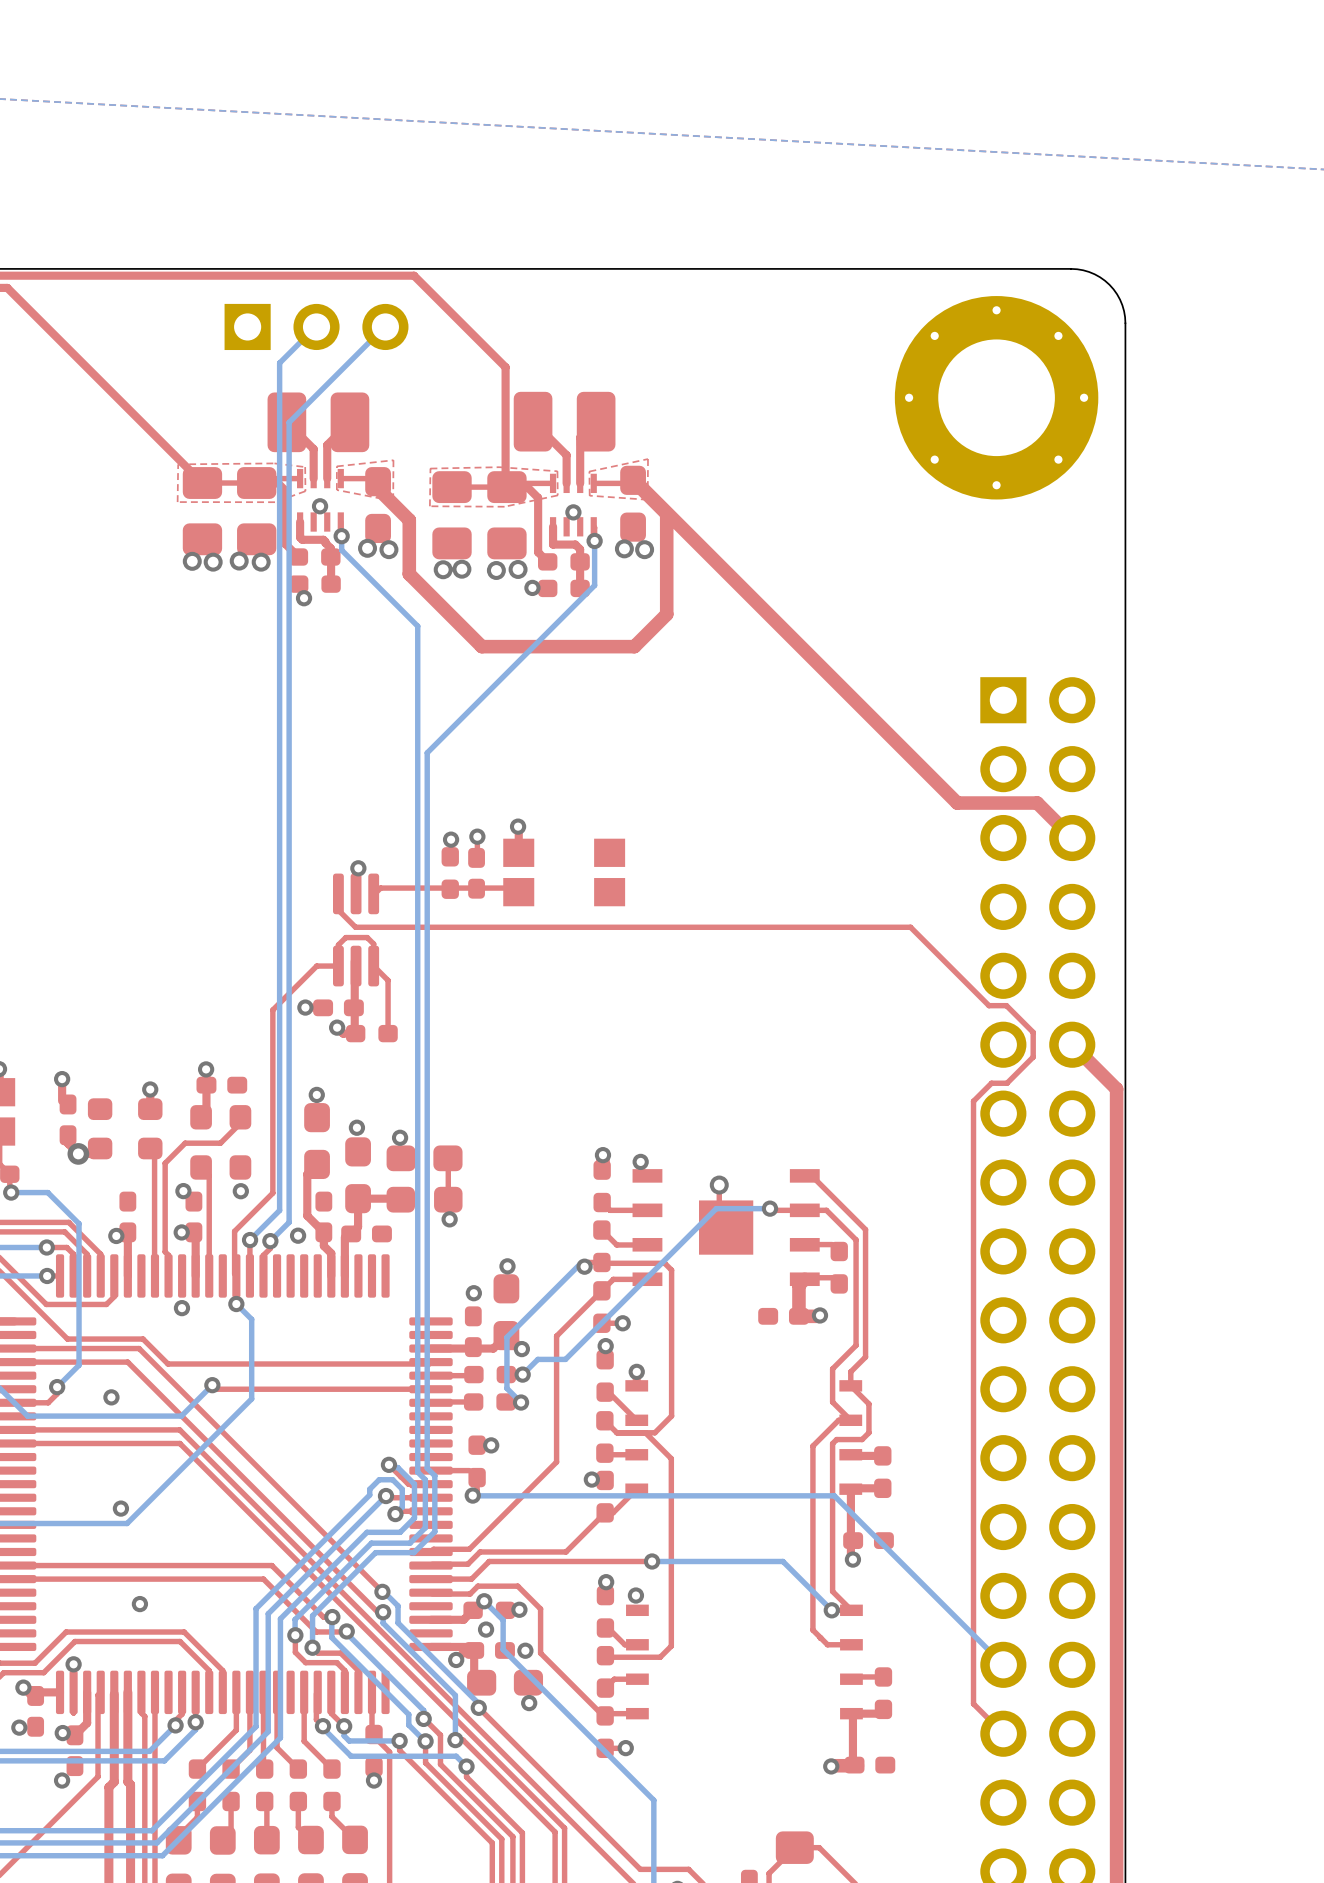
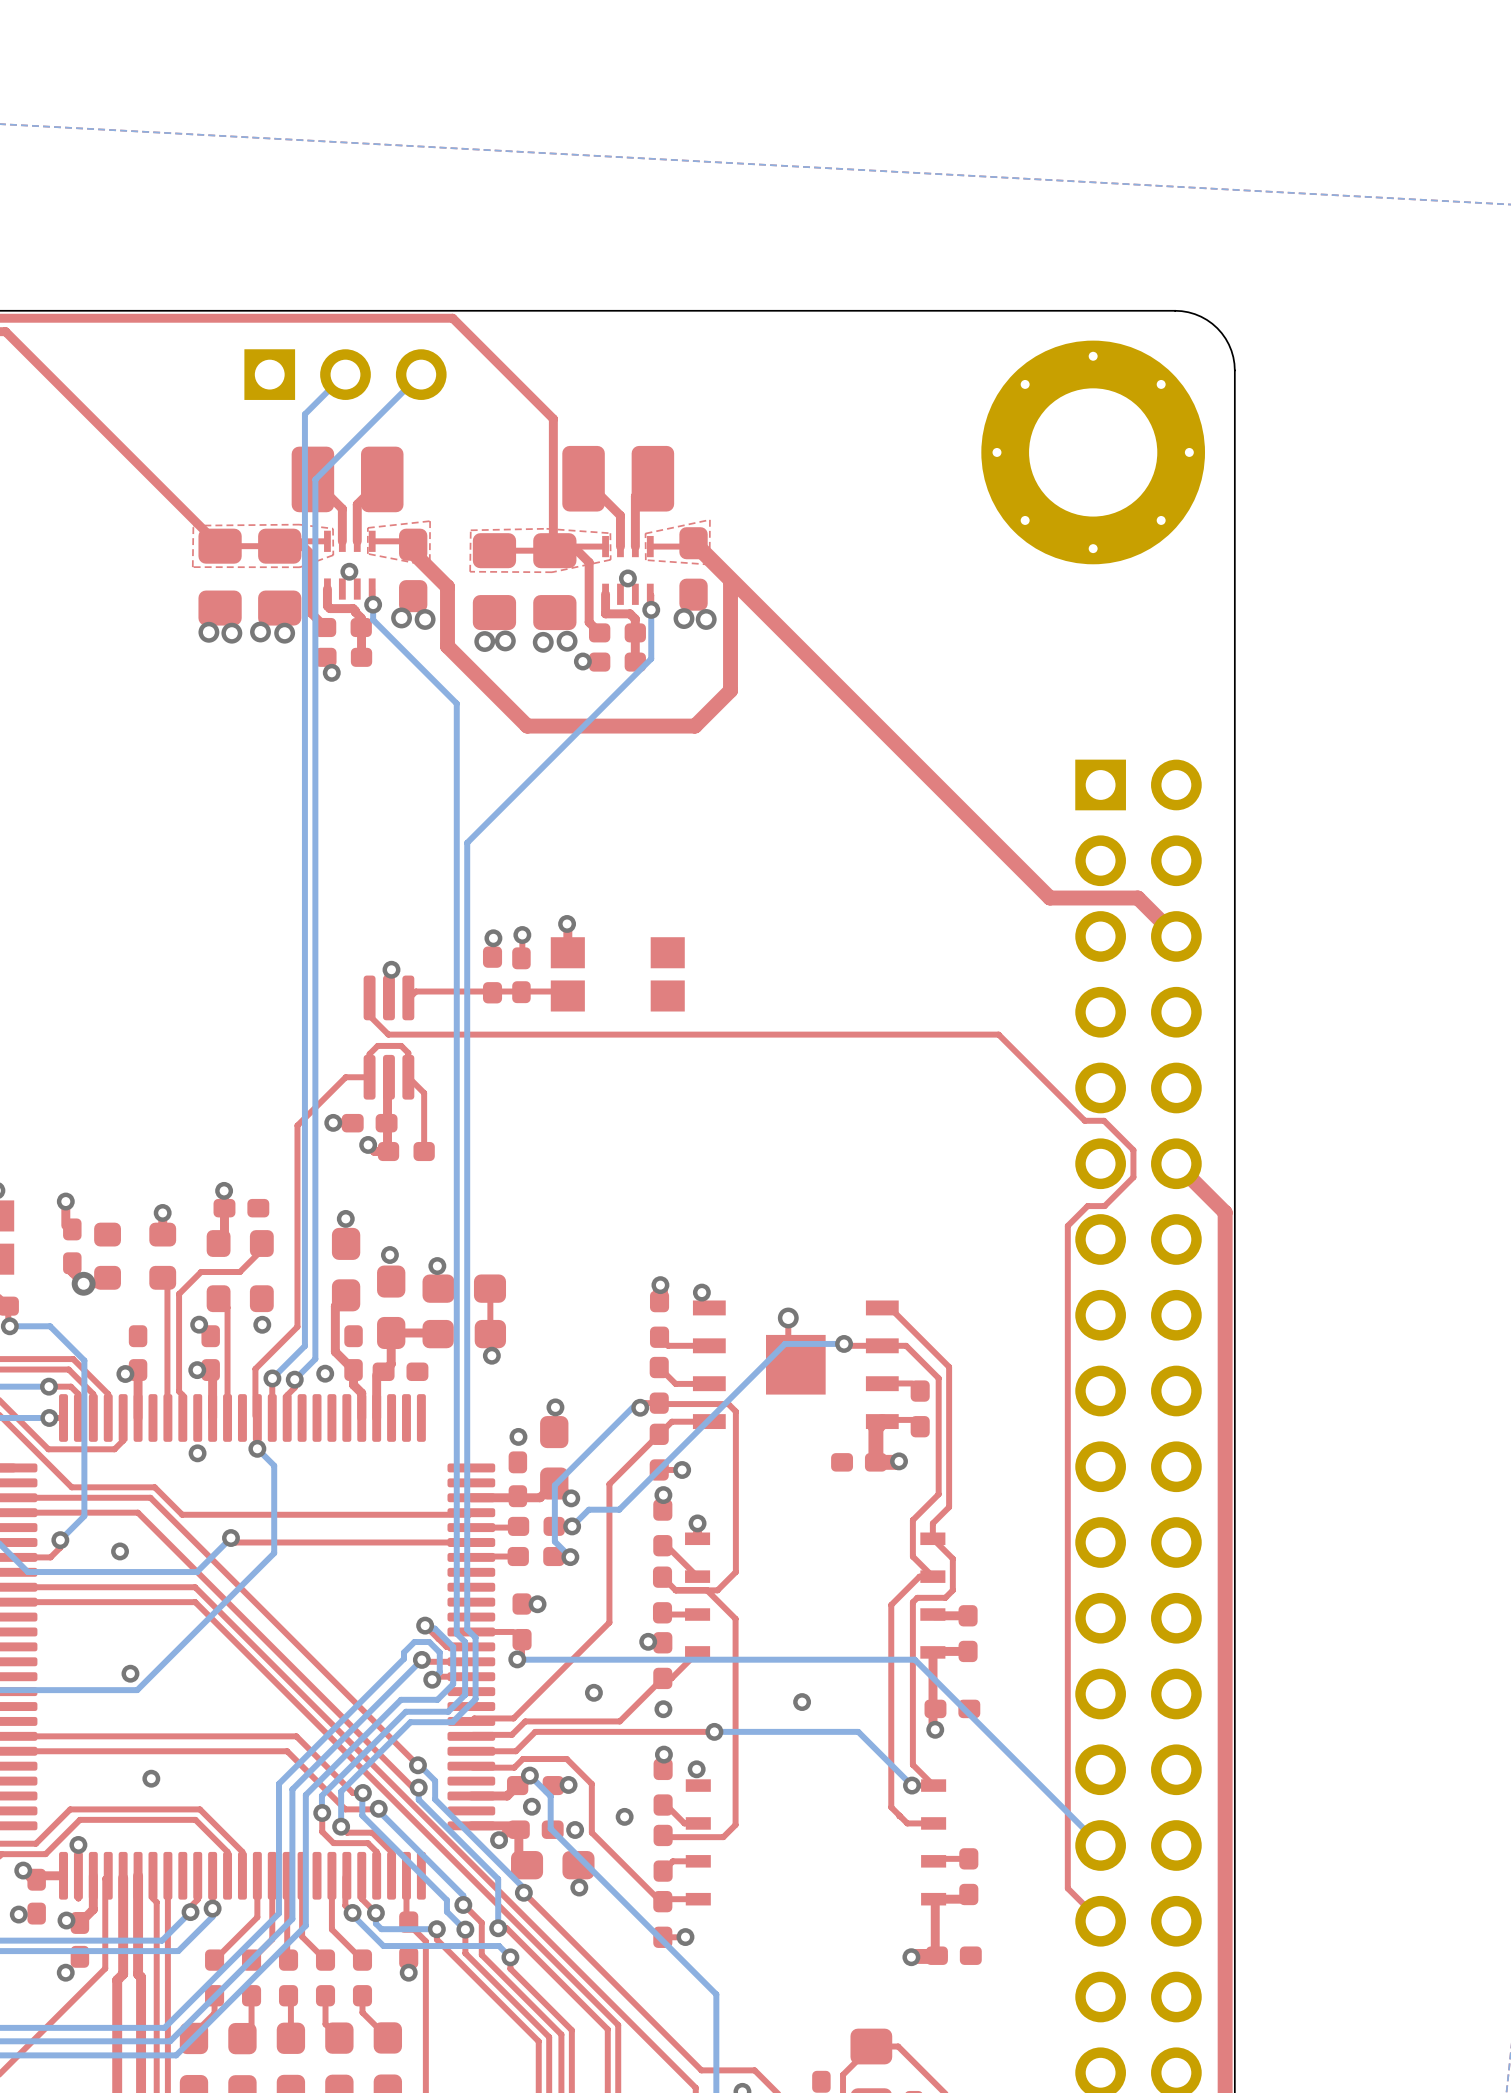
via: none -> (593, 1692)
via: none -> (802, 1702)
via: none -> (663, 1709)
via: none -> (624, 1816)

